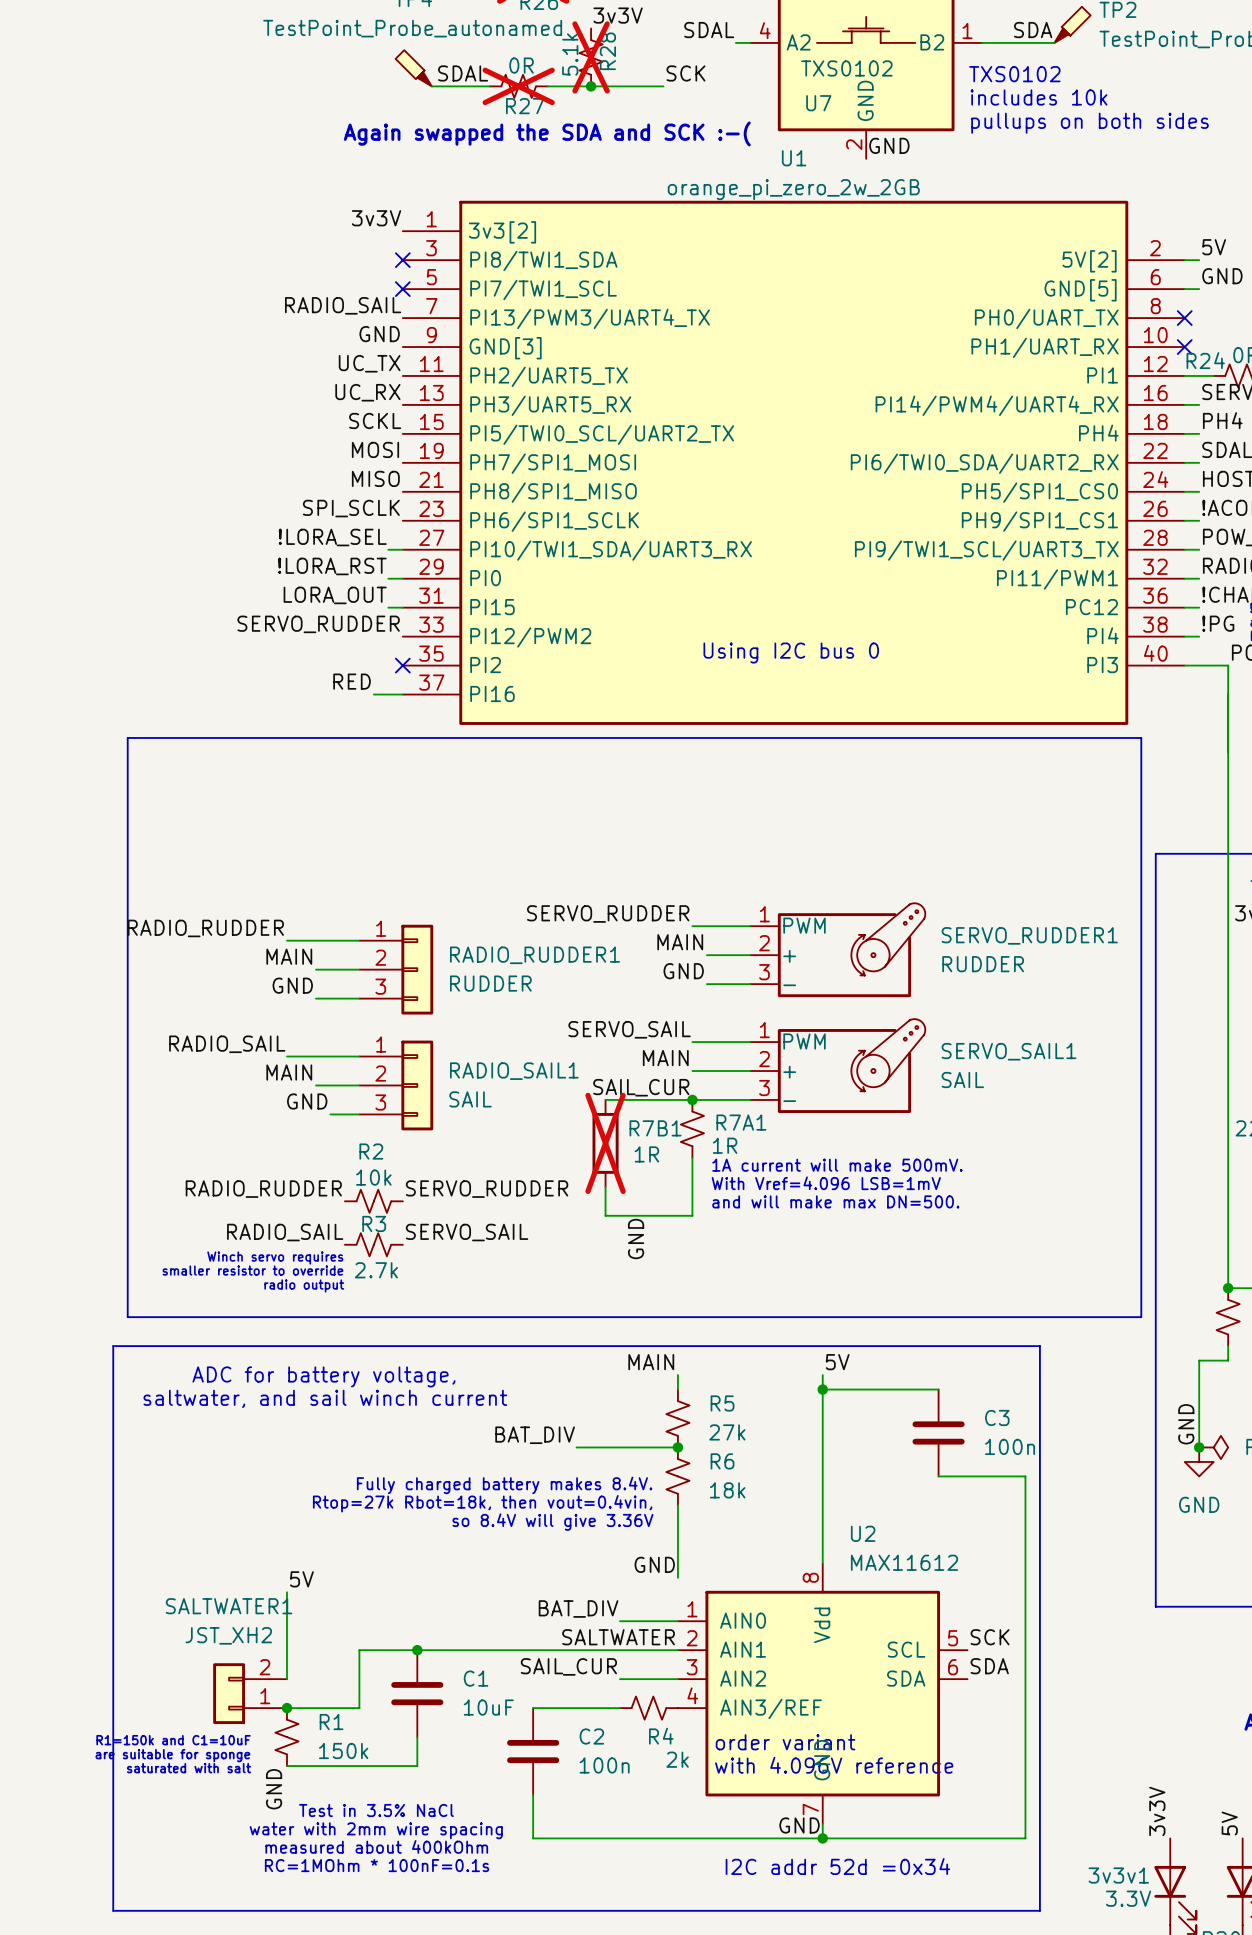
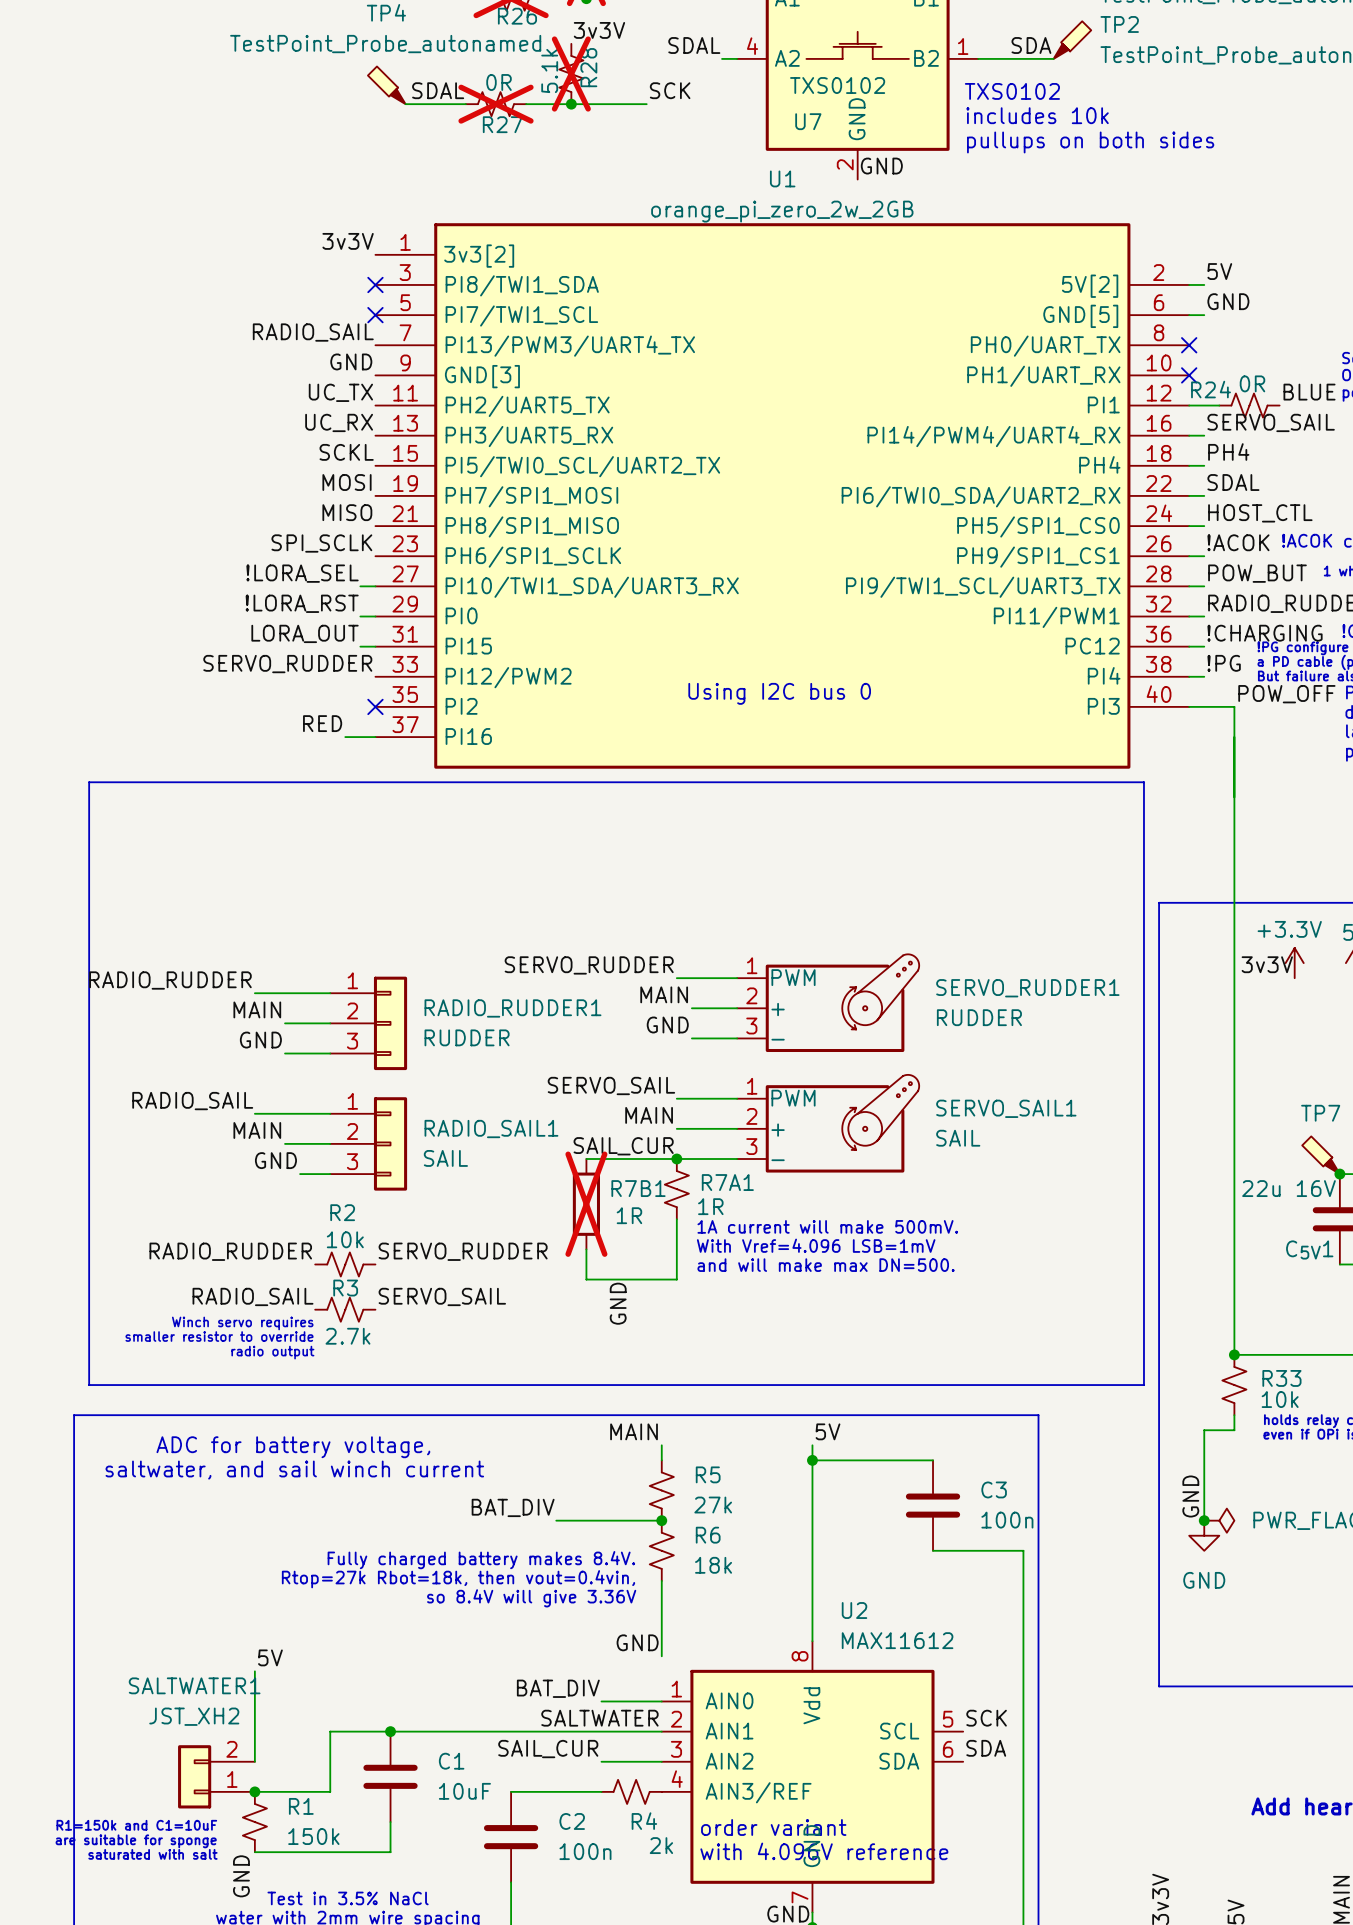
text: Again swapped the SDA and SCK :-( (547, 133) -> none

